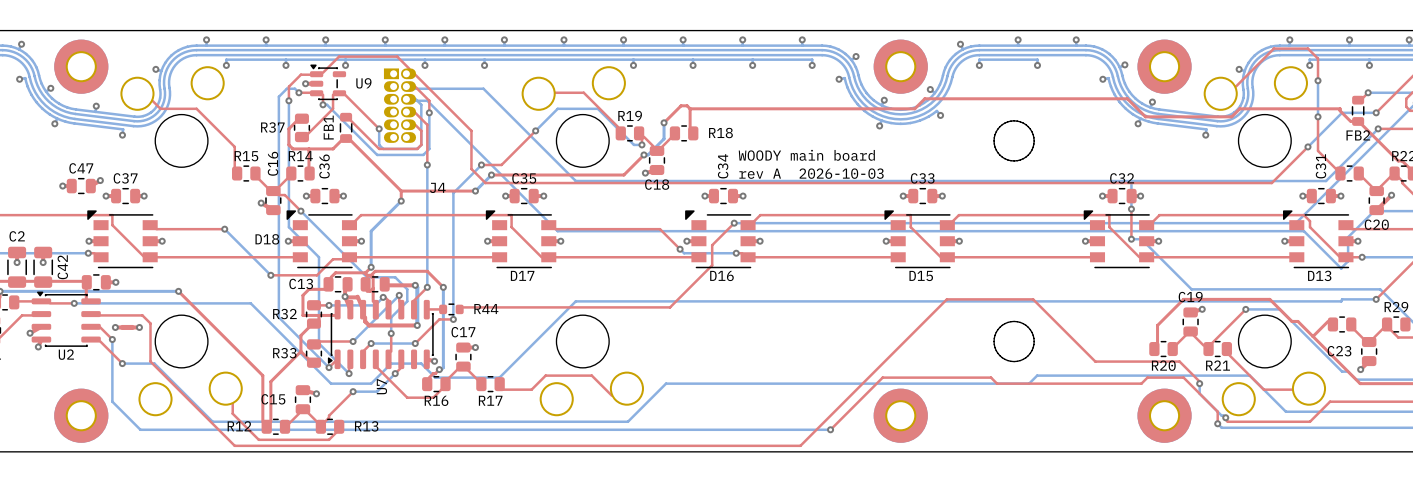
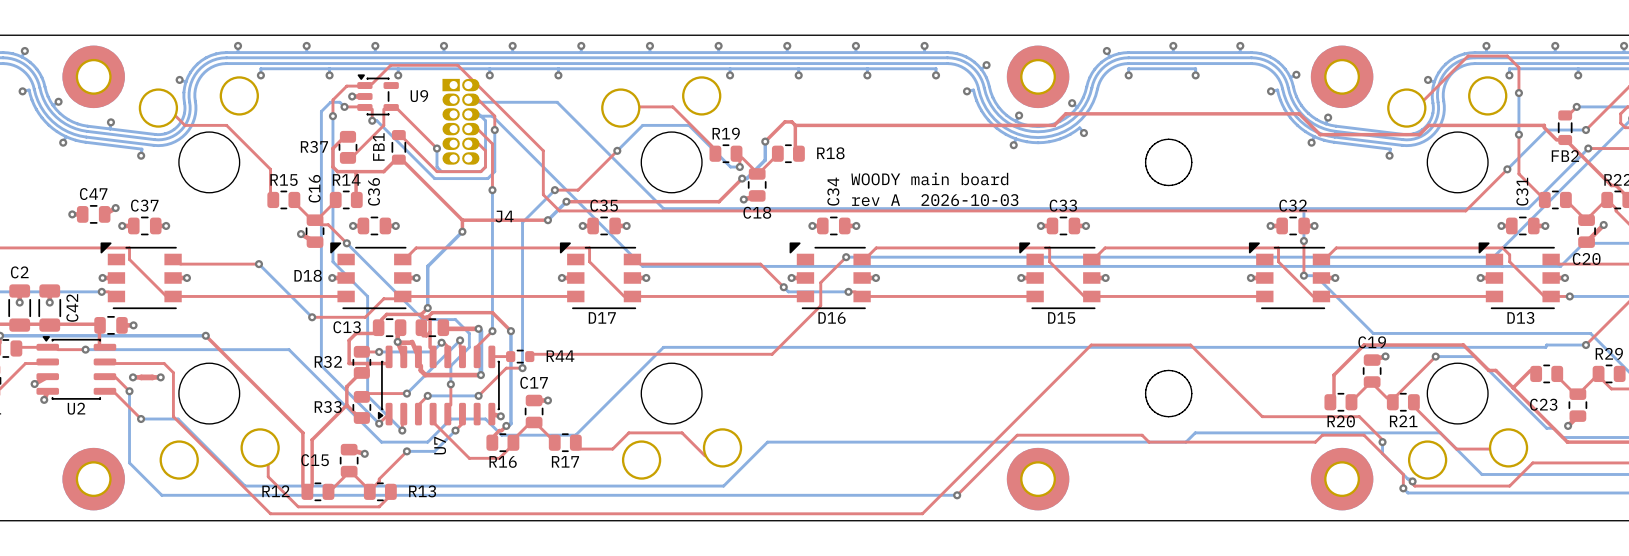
bottom track: (1303, 231) (1341, 268) (1348, 261) (1348, 237) (1354, 231) -> (1502, 266) (1560, 266)

